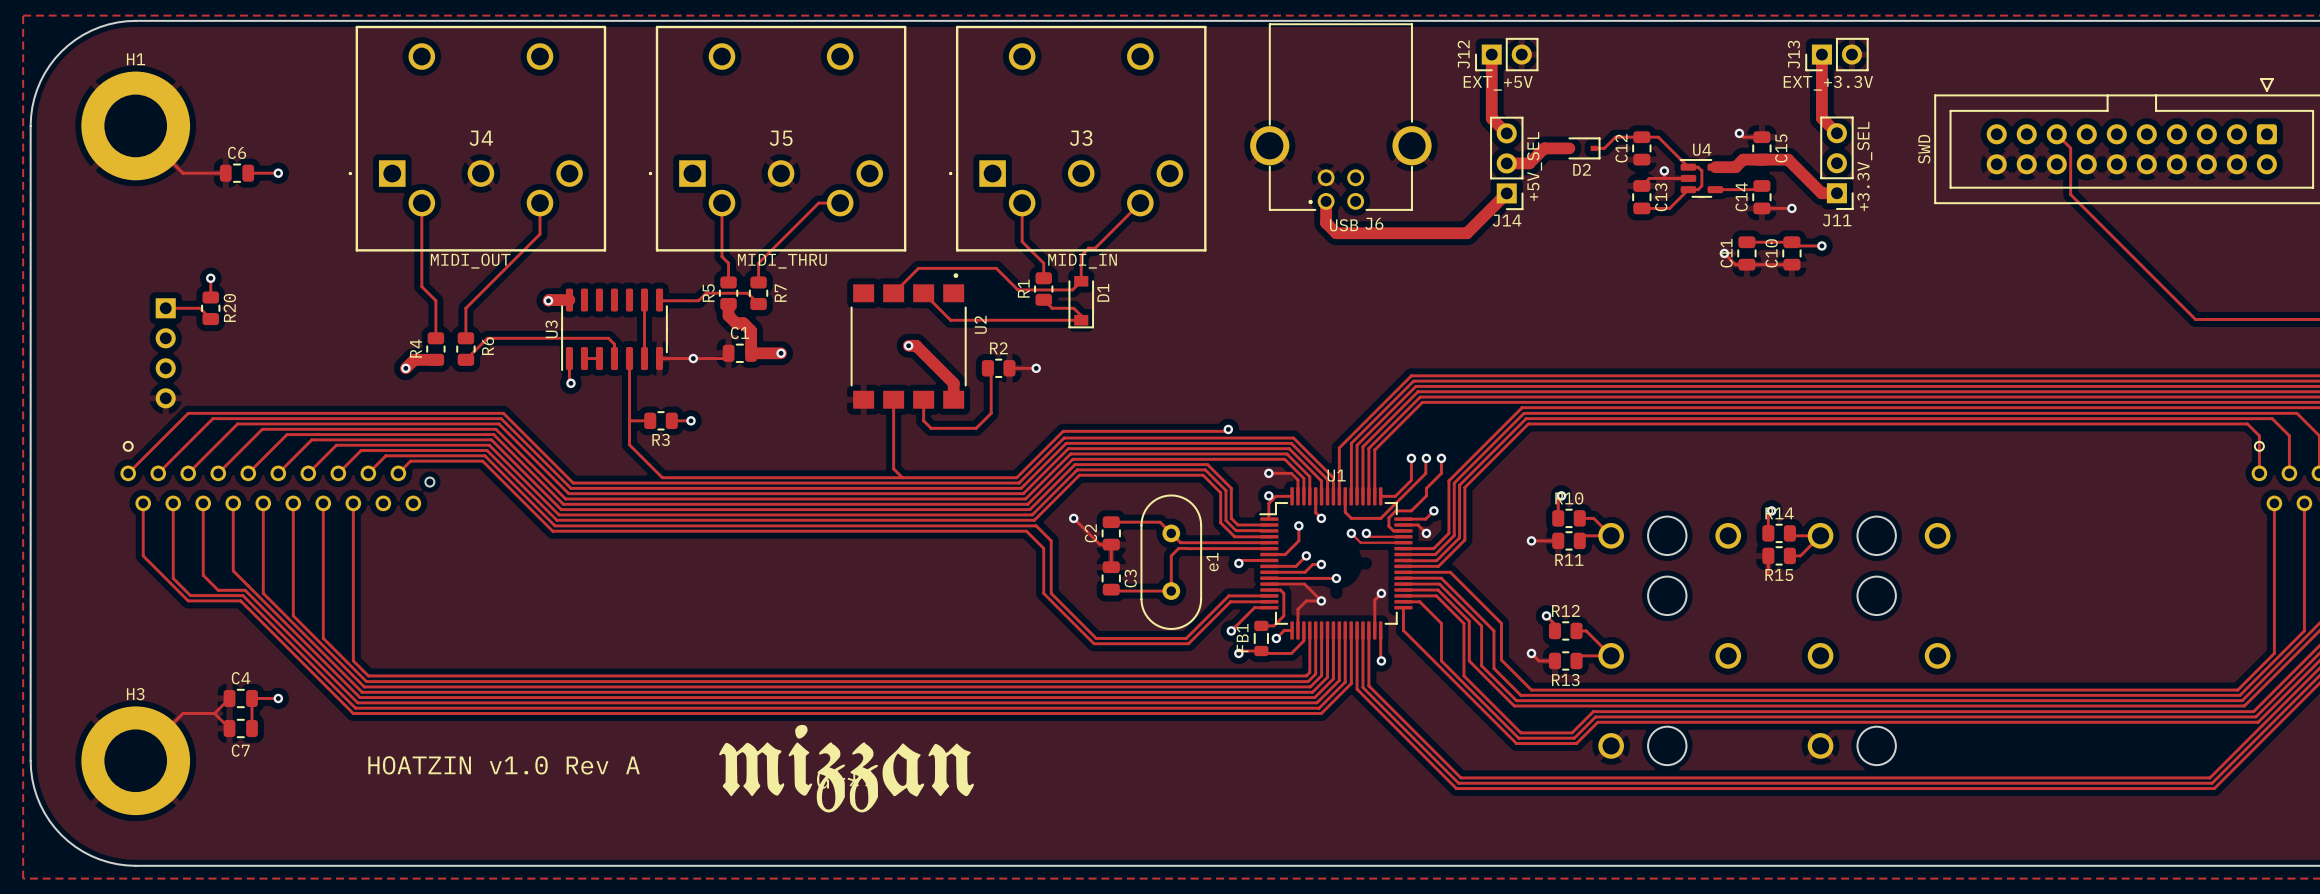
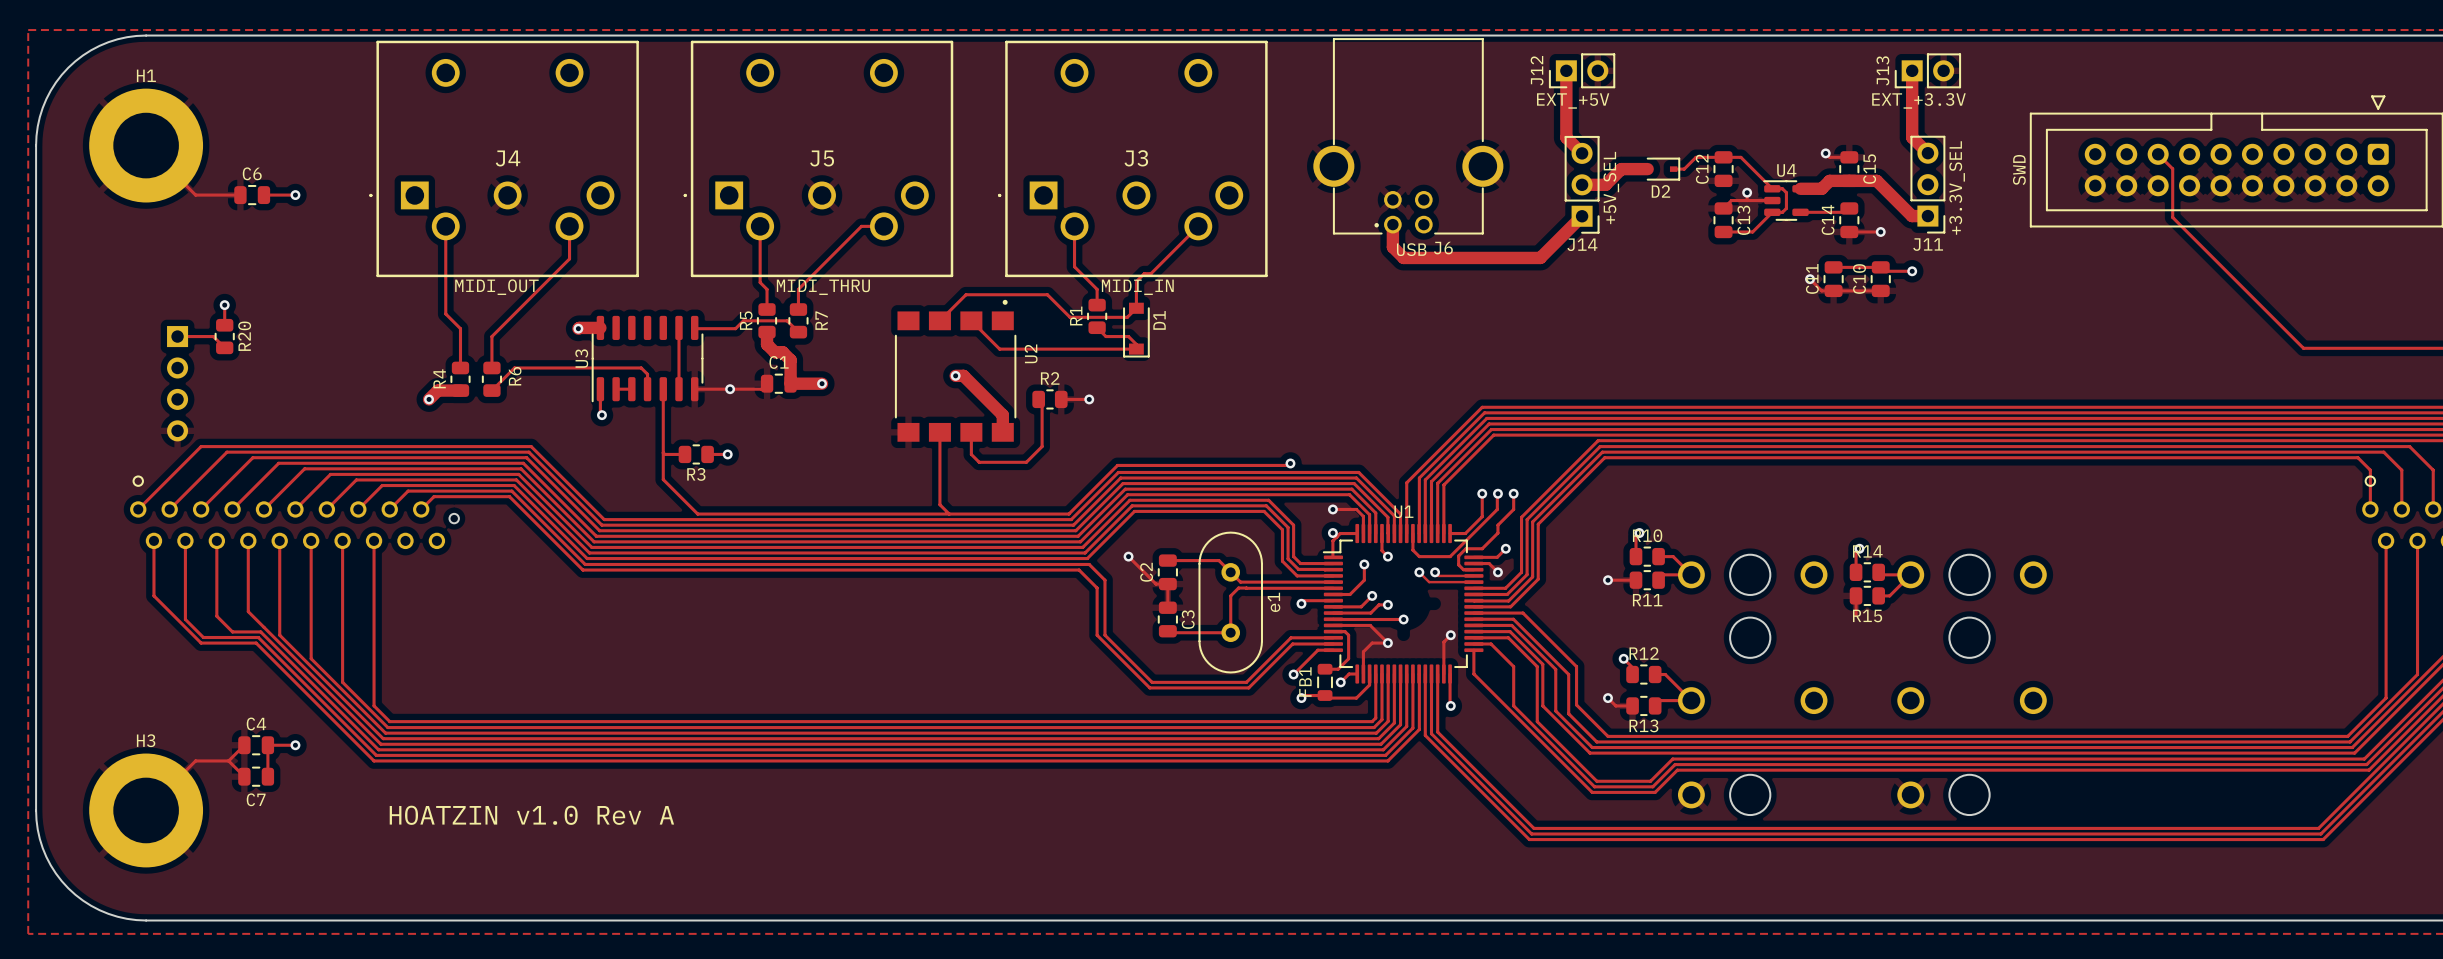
part: (846, 768) -> none

